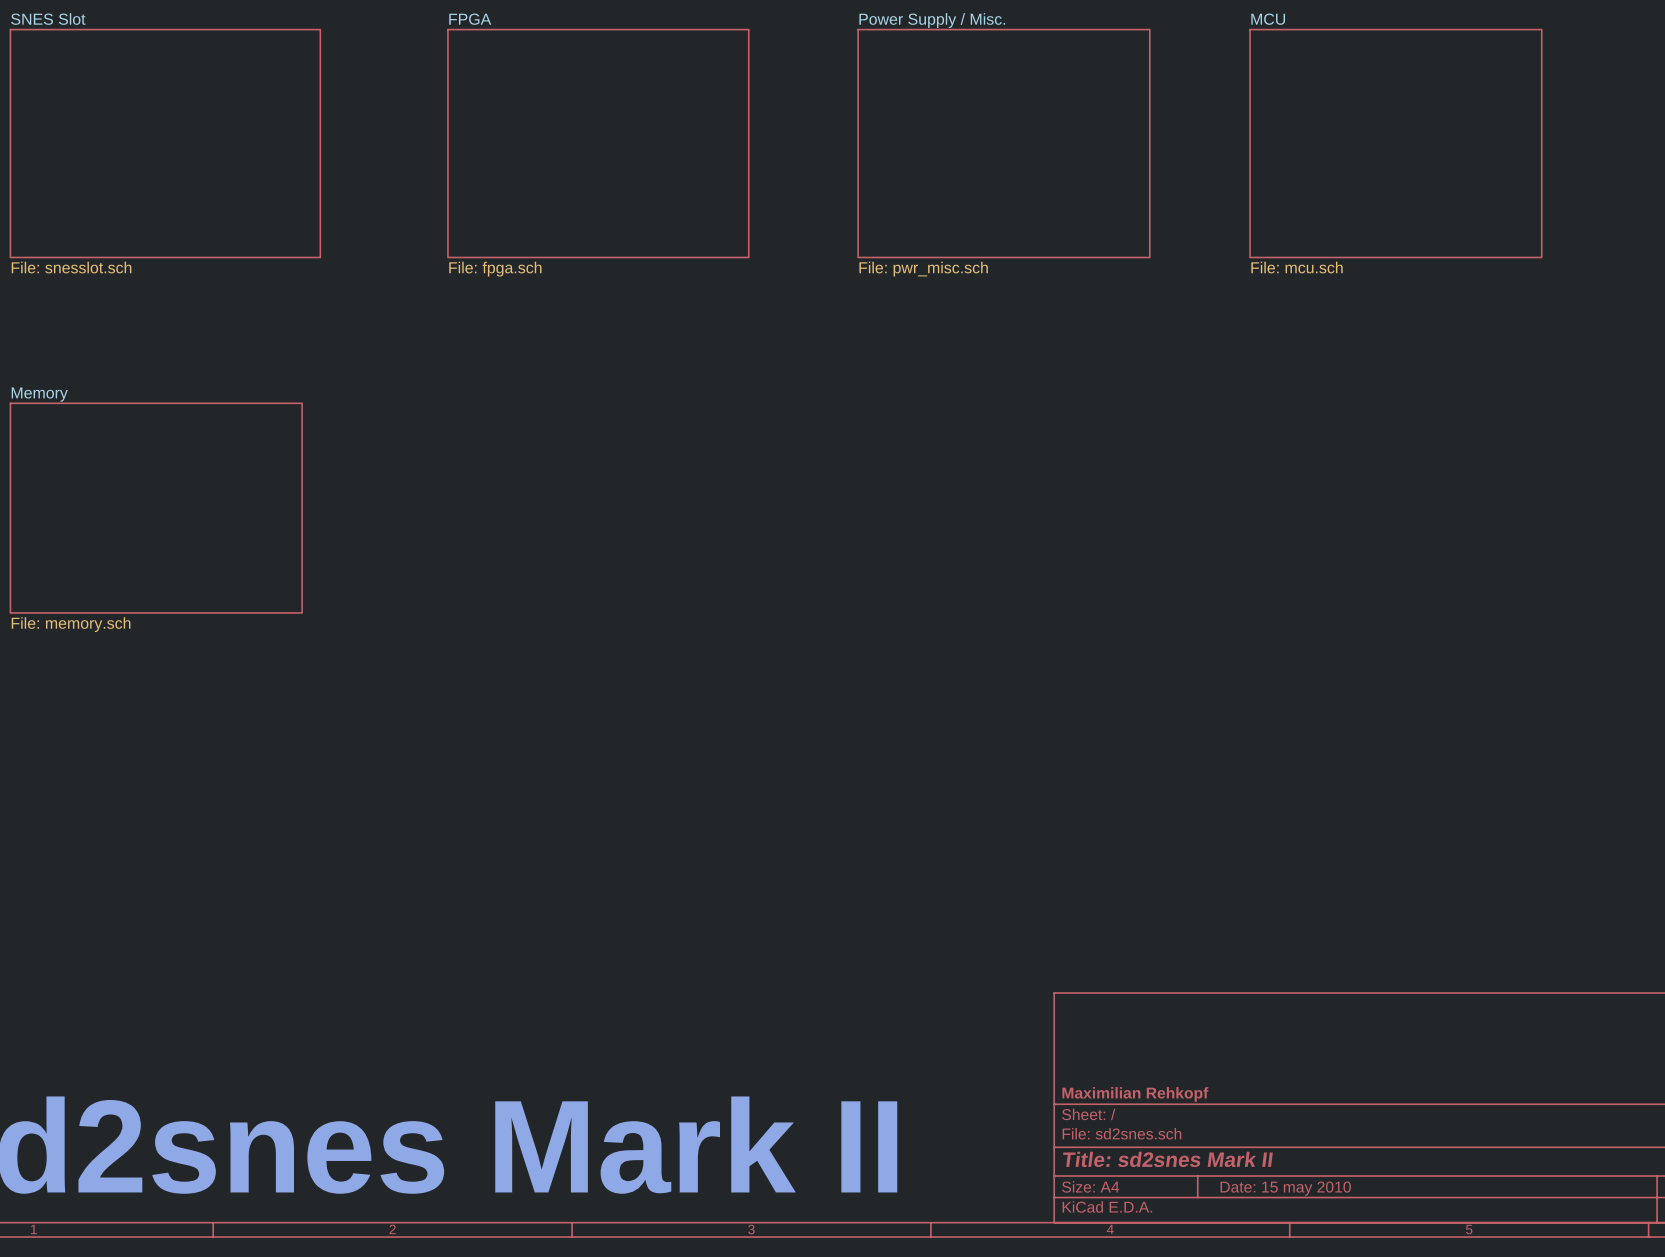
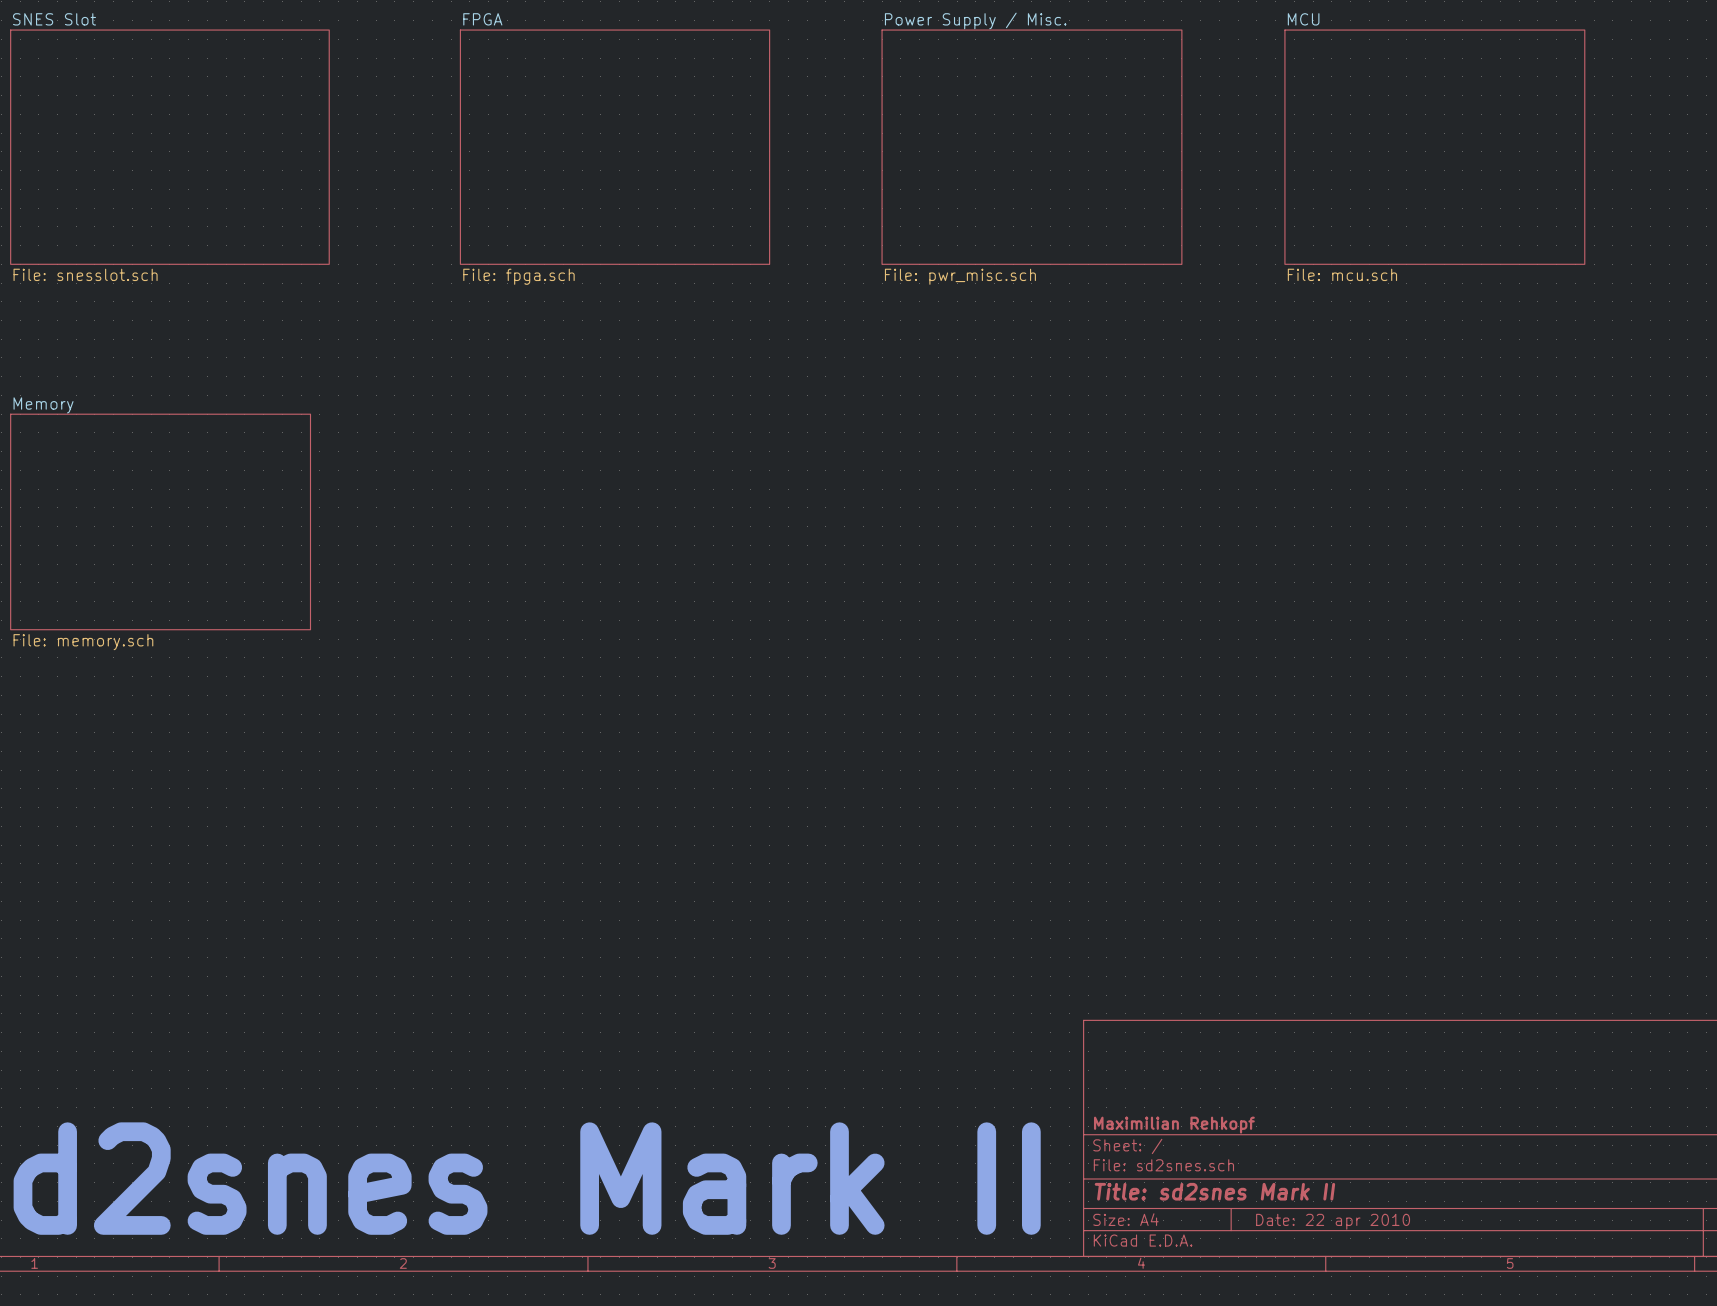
title block: Date: 15 may 2010 (1285, 1188) -> Date: 22 apr 2010 (1333, 1221)

